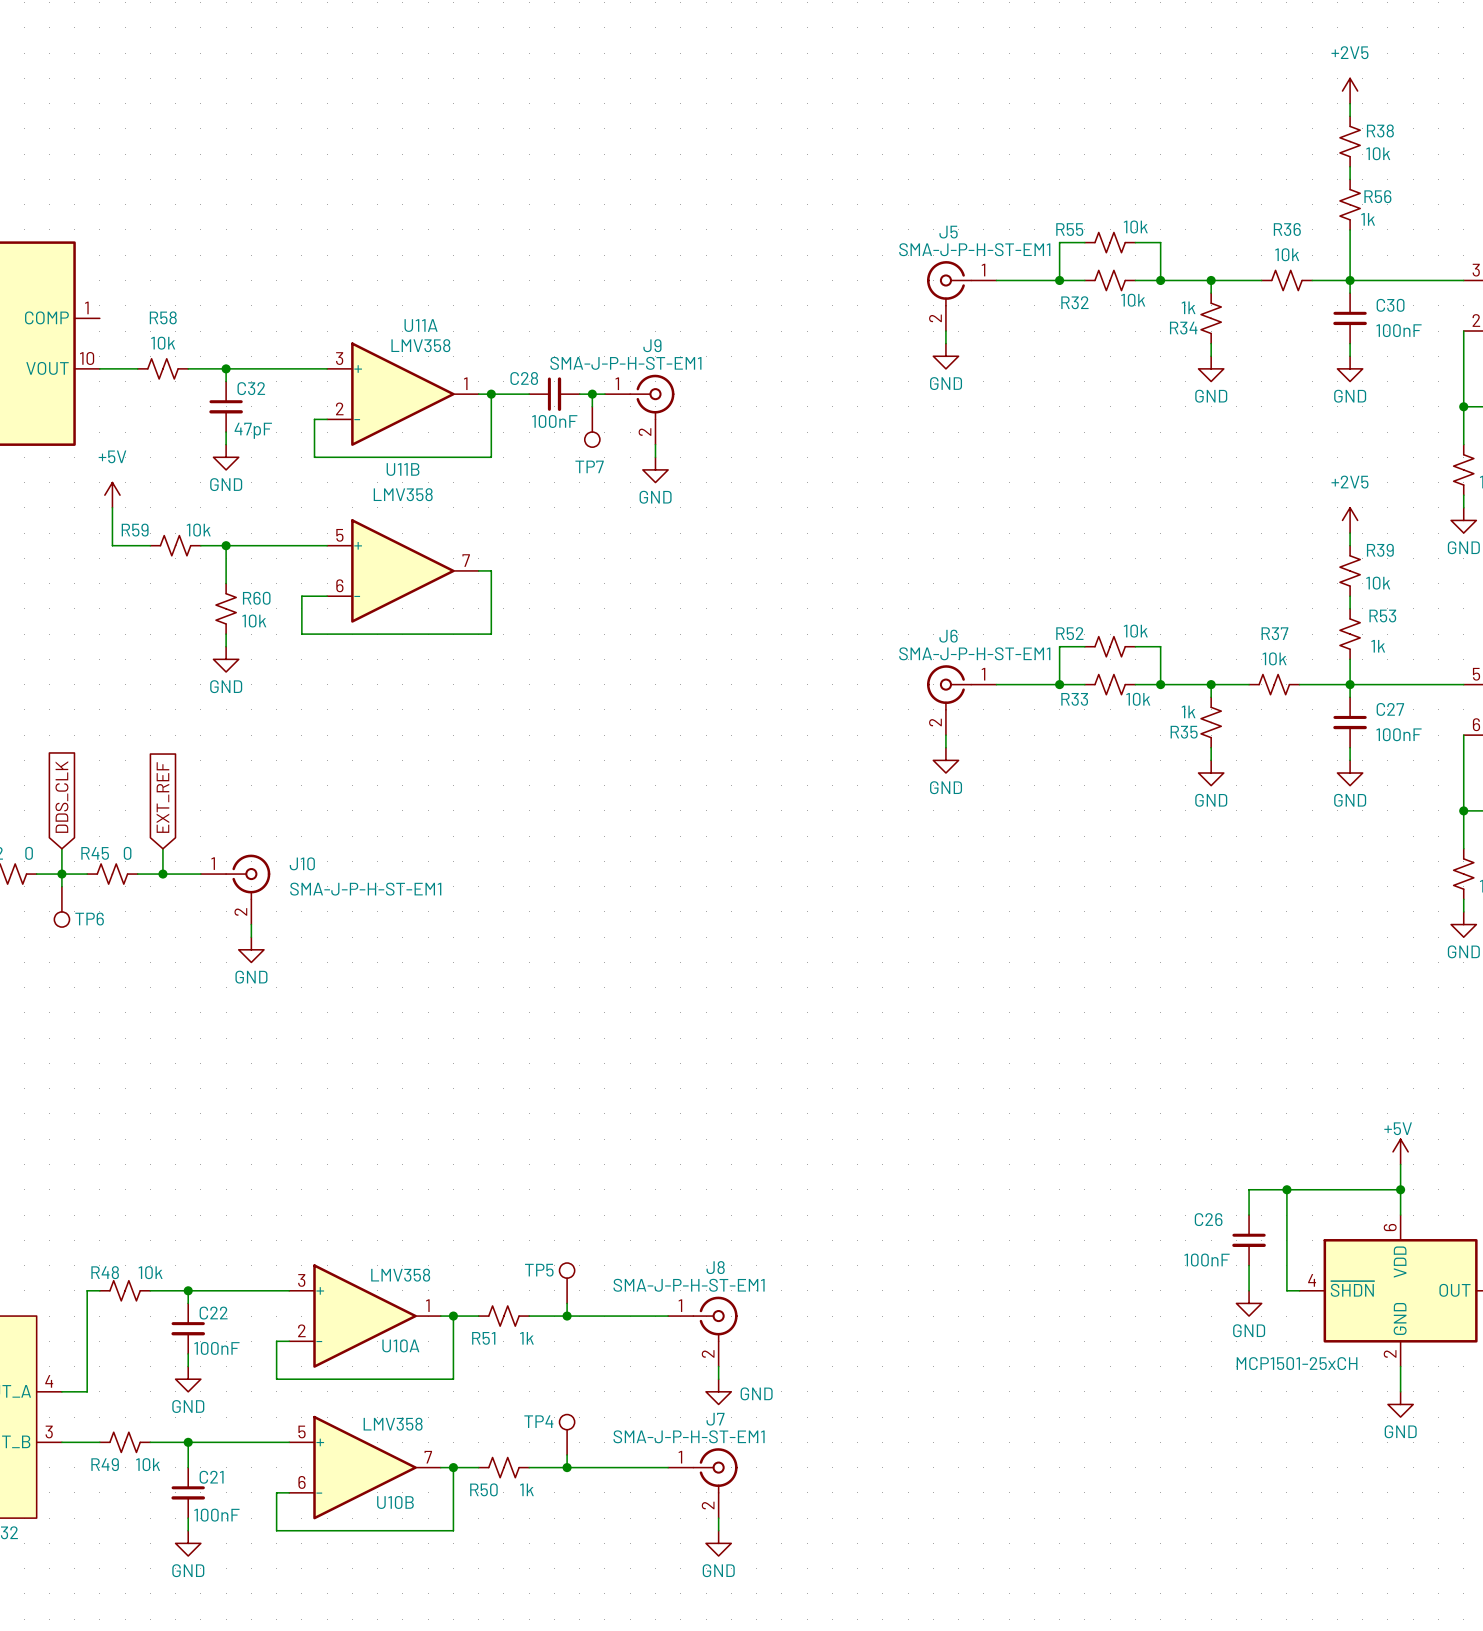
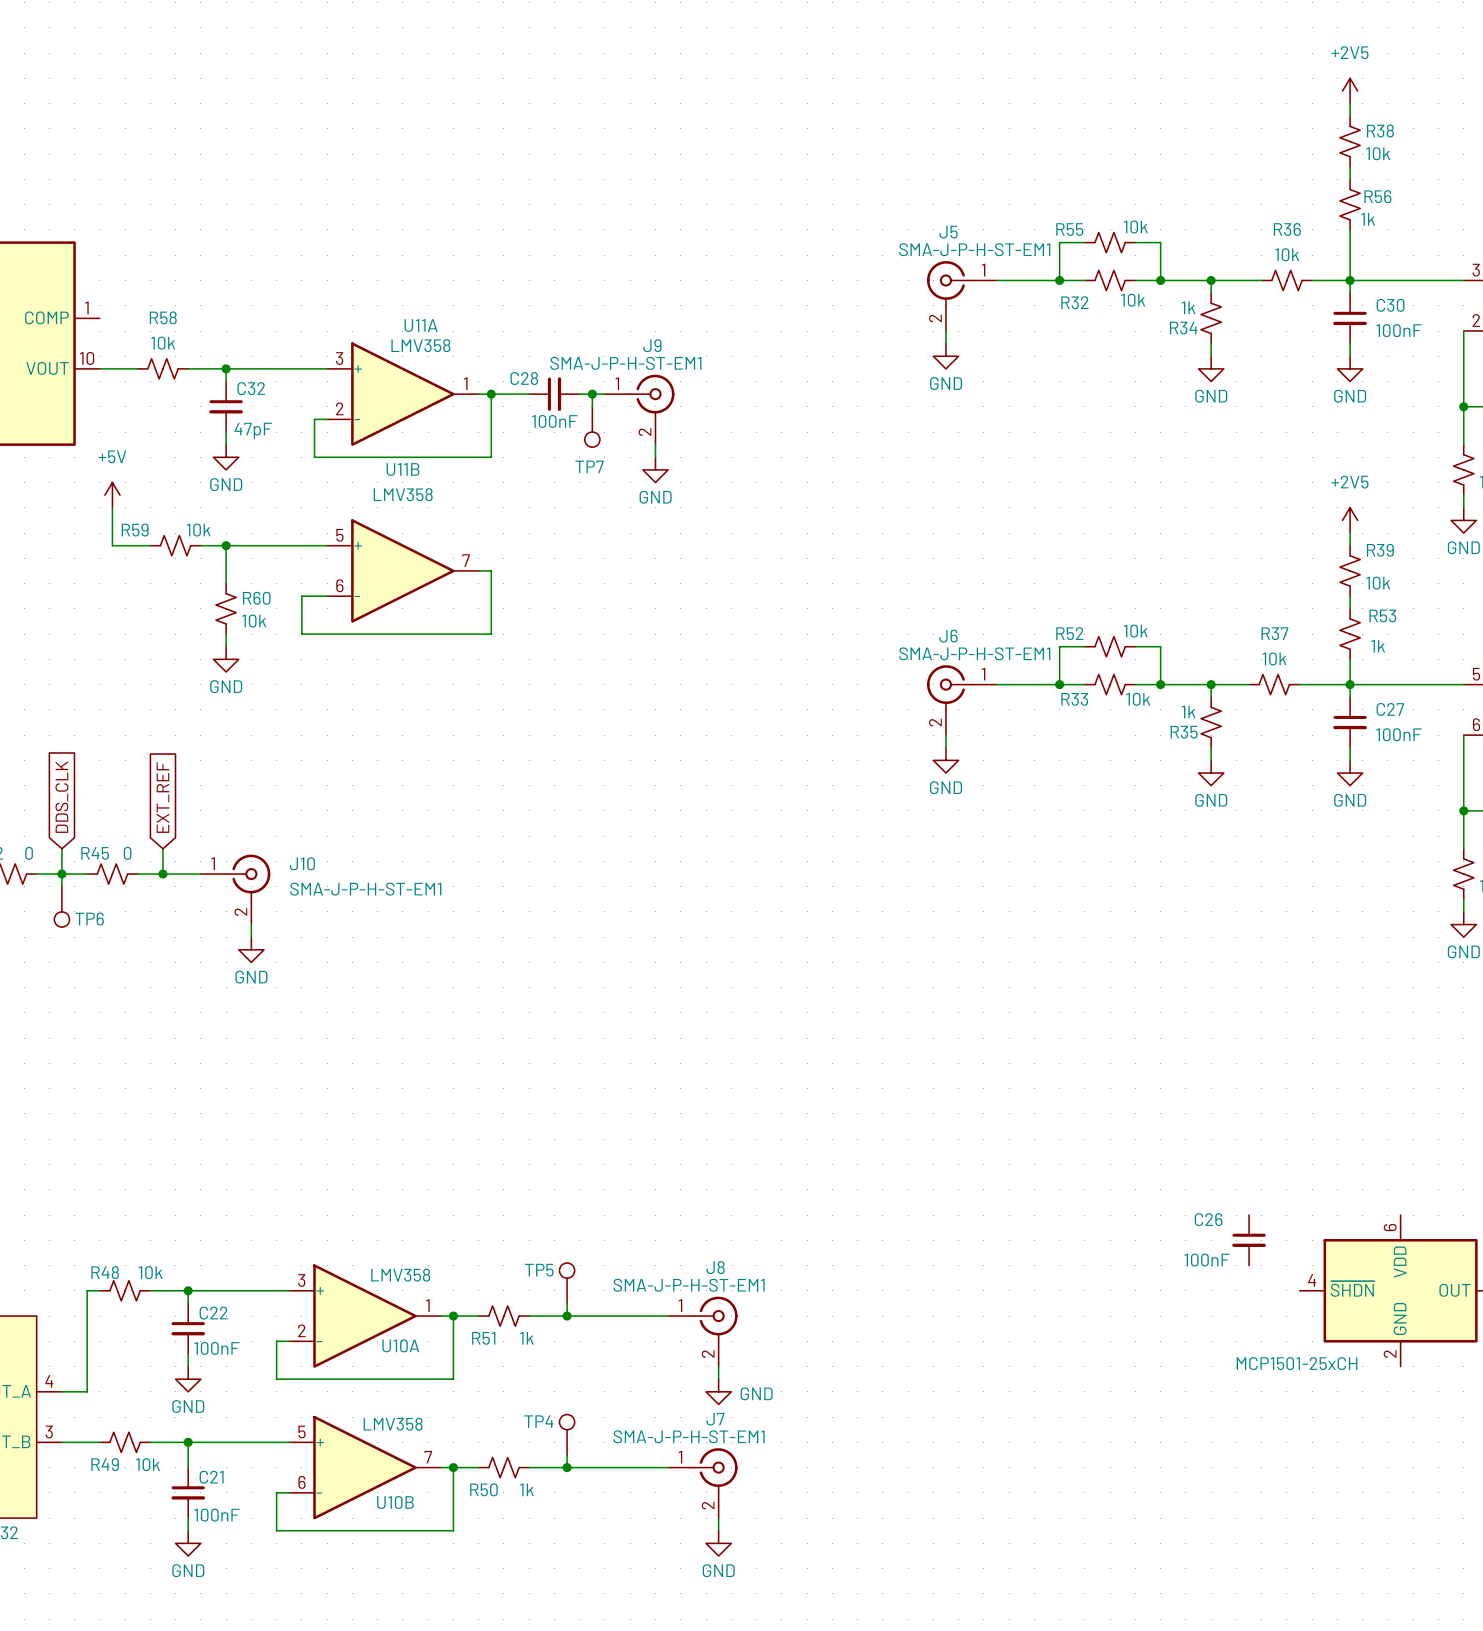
power symbol: +5V (1400, 1151) -> none
wire: (1400, 1164) (1400, 1215) -> none
wire: (1286, 1189) (1286, 1290) (1299, 1290) -> none
junction: (1286, 1189) -> none
wire: (1400, 1189) (1249, 1189) (1249, 1215) -> none
junction: (1400, 1189) -> none
wire: (1249, 1265) (1249, 1290) -> none
power symbol: GND (1249, 1303) -> none
wire: (1400, 1366) (1400, 1391) -> none
power symbol: GND (1400, 1404) -> none

